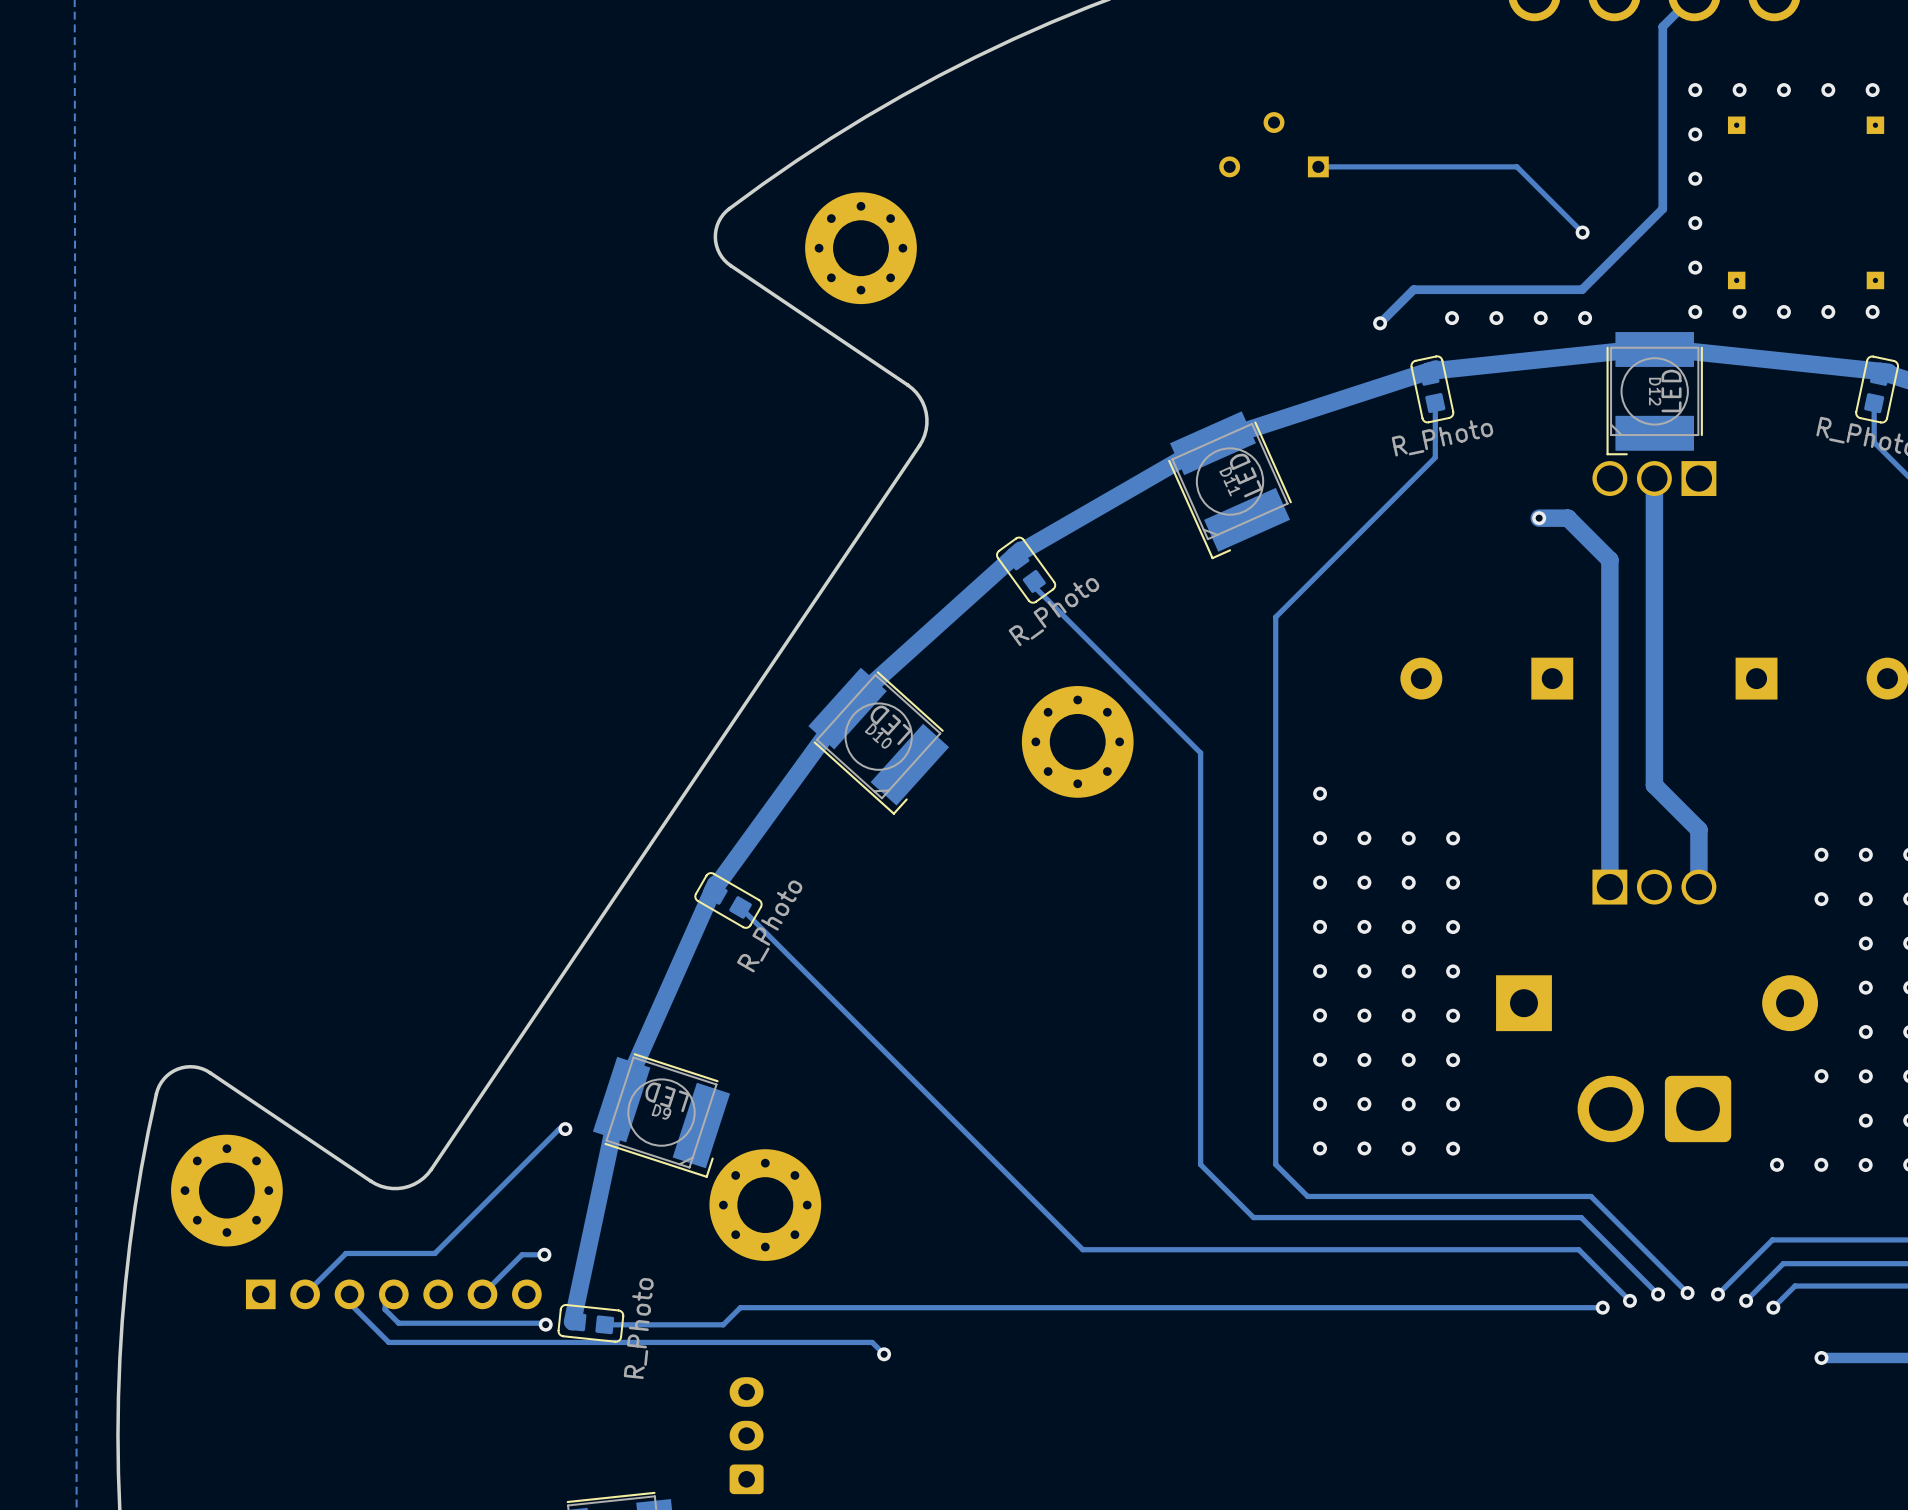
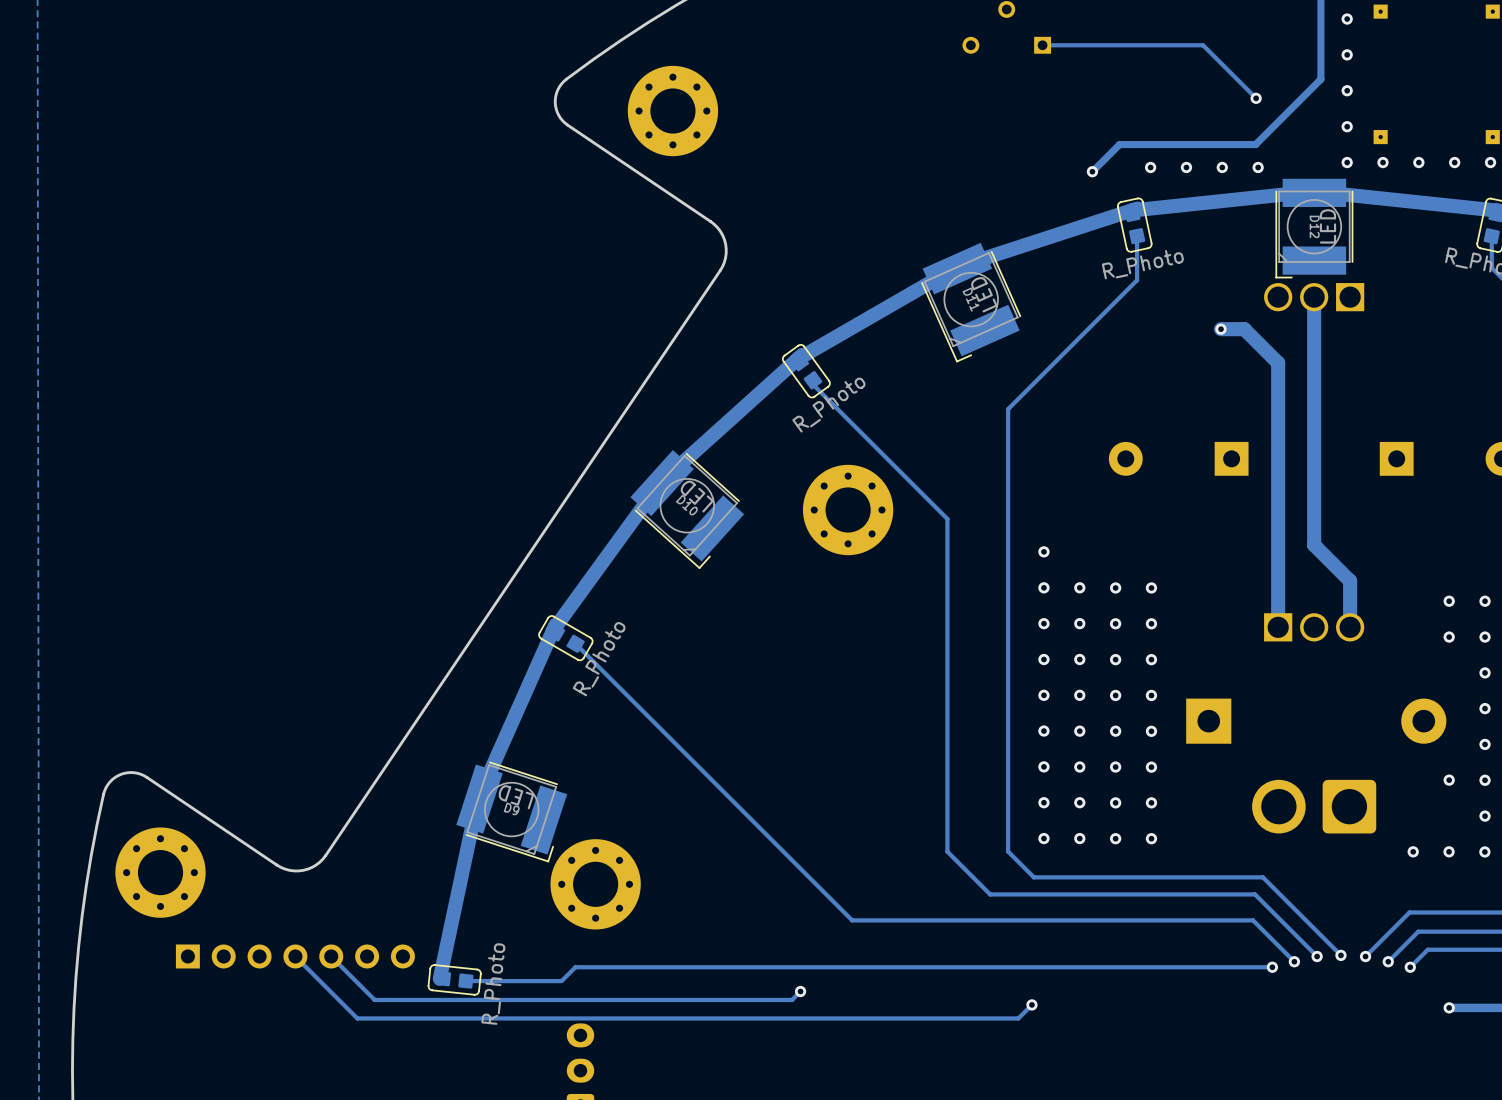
track: (565, 1129) (559, 1129) (434, 1253) (346, 1253) (305, 1294) -> none
via: (565, 1129) -> none
track: (544, 1254) (522, 1254) (482, 1294) -> none
via: (544, 1254) -> none
track: (349, 1294) (349, 1303) (388, 1342) (872, 1342) (884, 1354) -> none
track: (385, 1294) (385, 1309) (398, 1323) (545, 1324) -> none
track: none -> (295, 956) (357, 1018) (1018, 1018) (1031, 1004)
track: none -> (331, 956) (374, 999) (792, 999) (800, 991)
via: (545, 1324) -> none
via: none -> (800, 991)
via: (884, 1354) -> none
via: none -> (1031, 1004)

